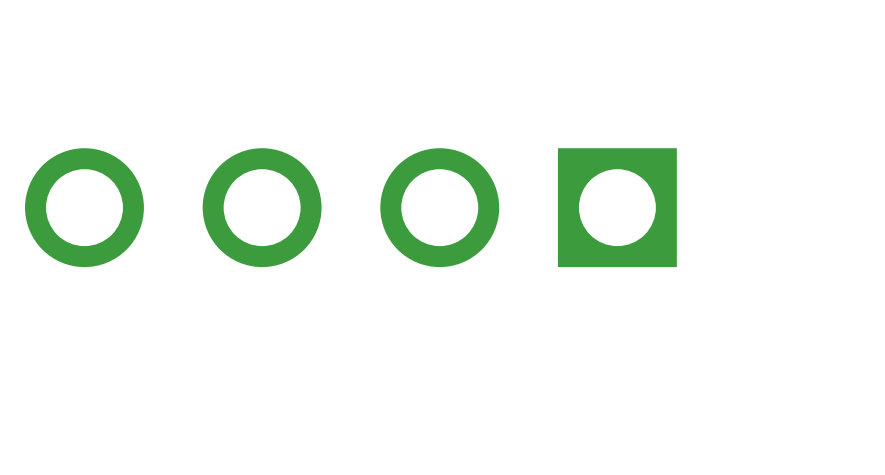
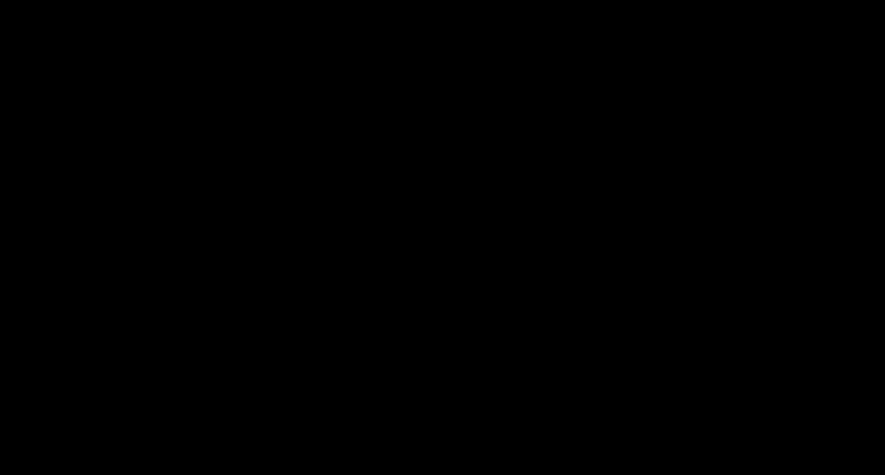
part: (350, 207) -> none

